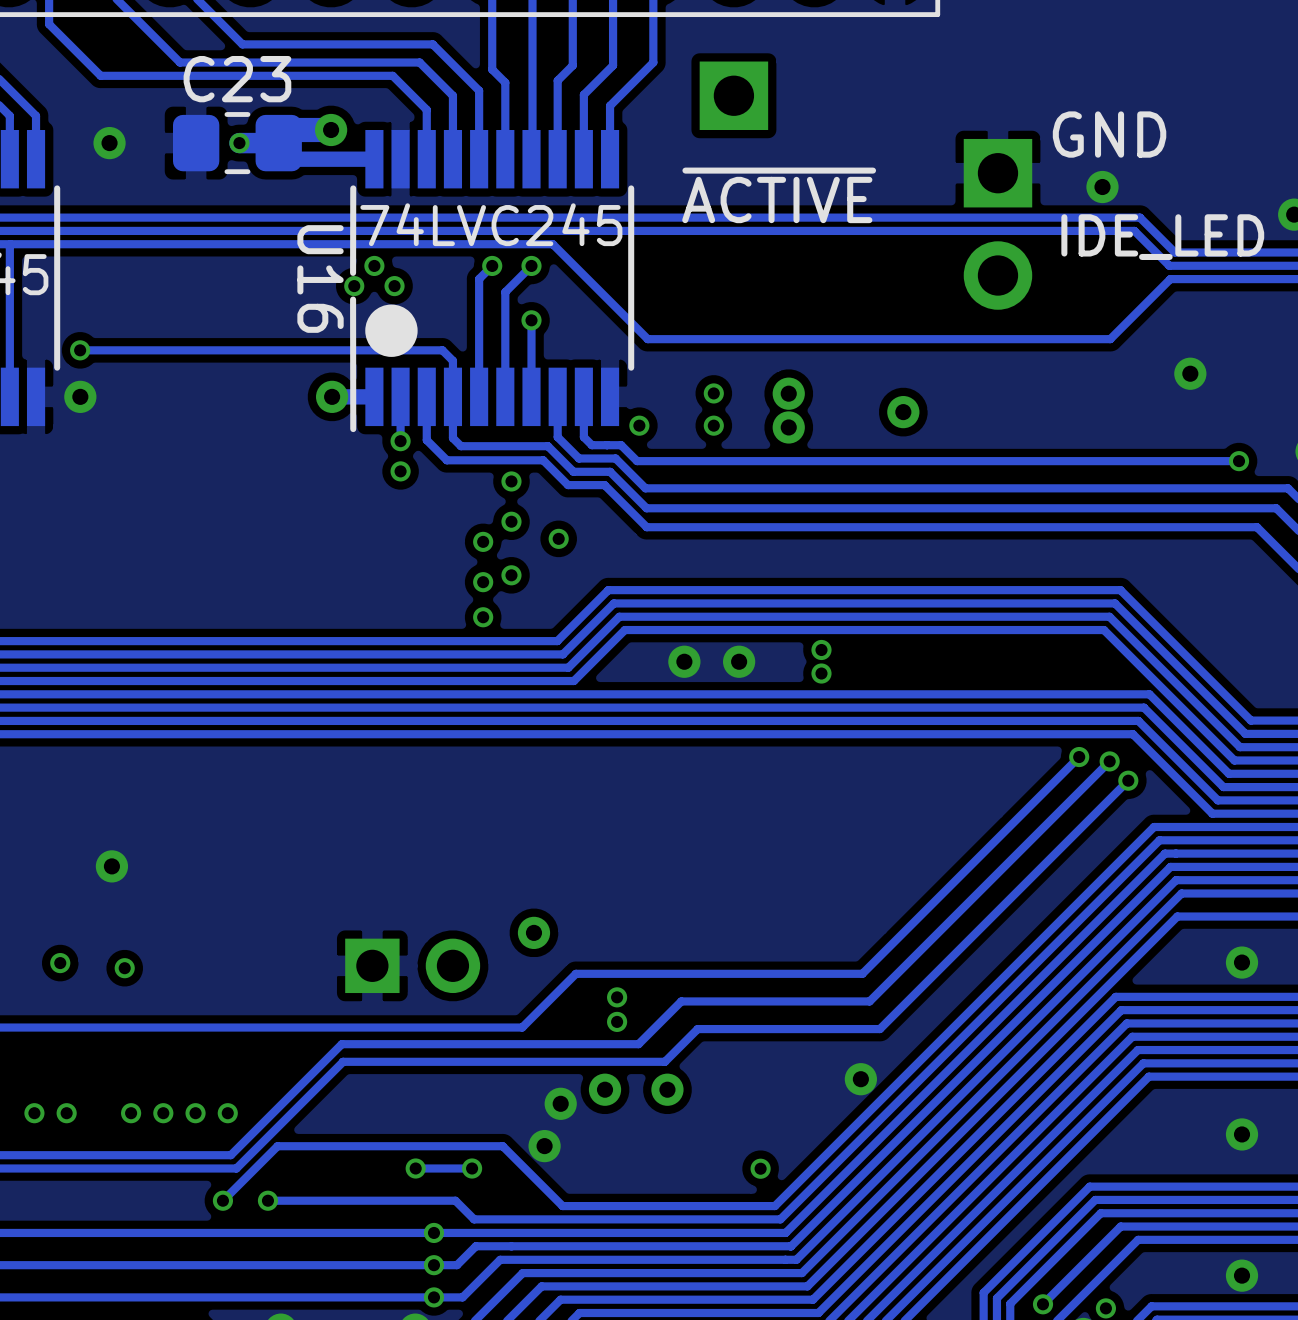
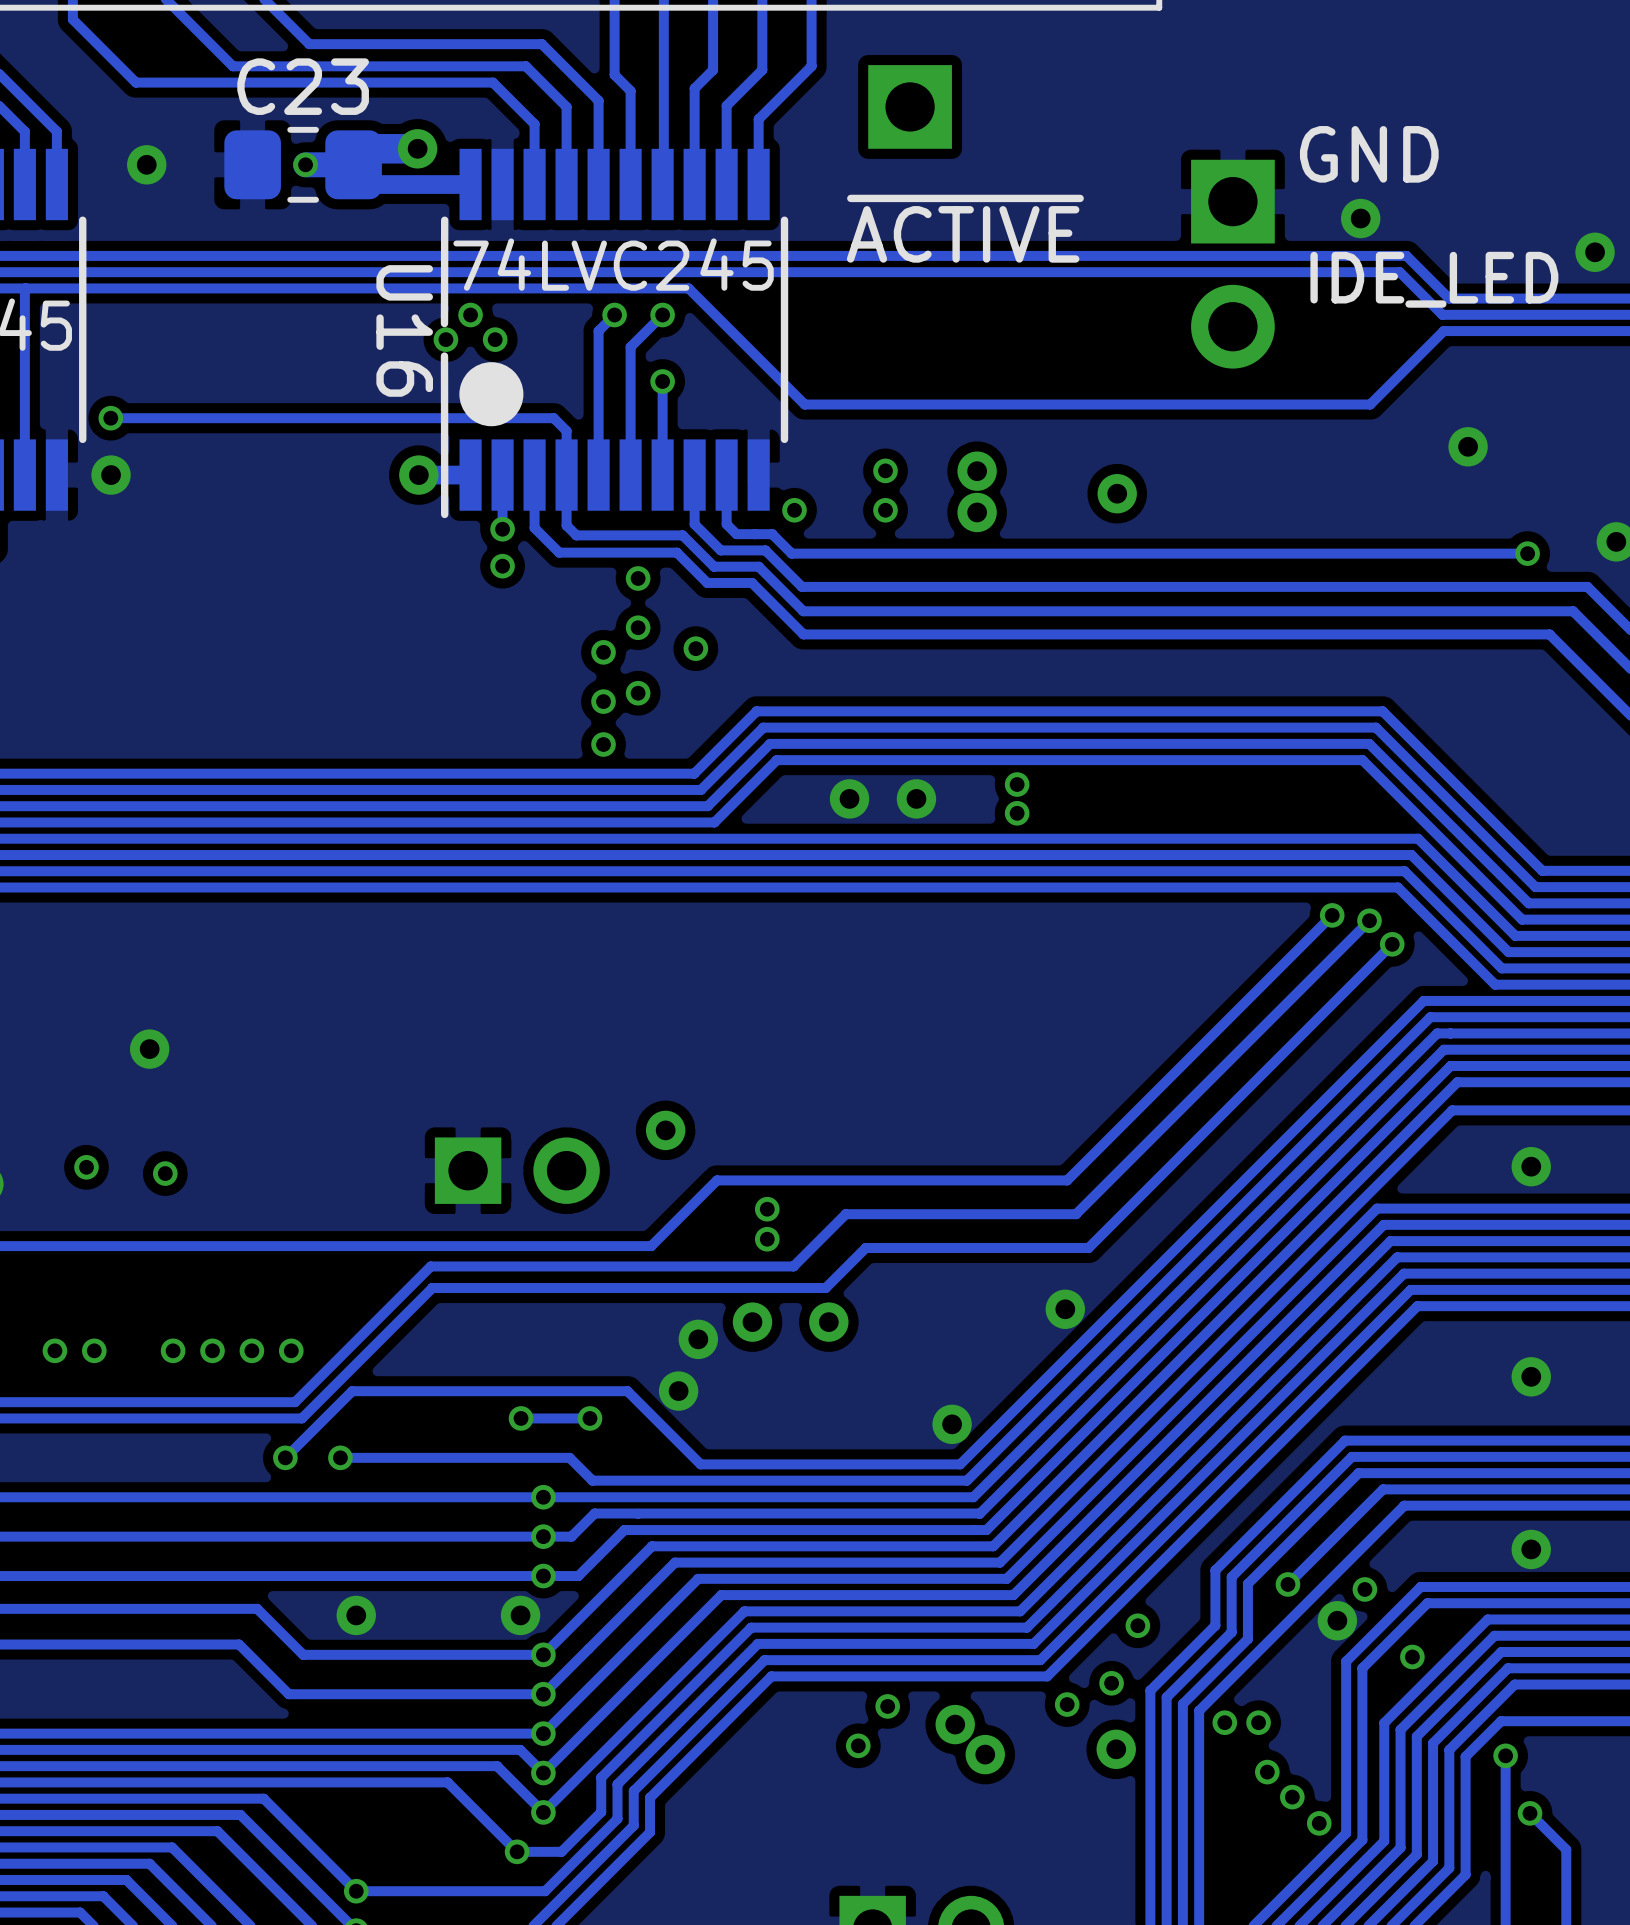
via size: [750, 1158, 771, 1179] -> [932, 1404, 972, 1445]

